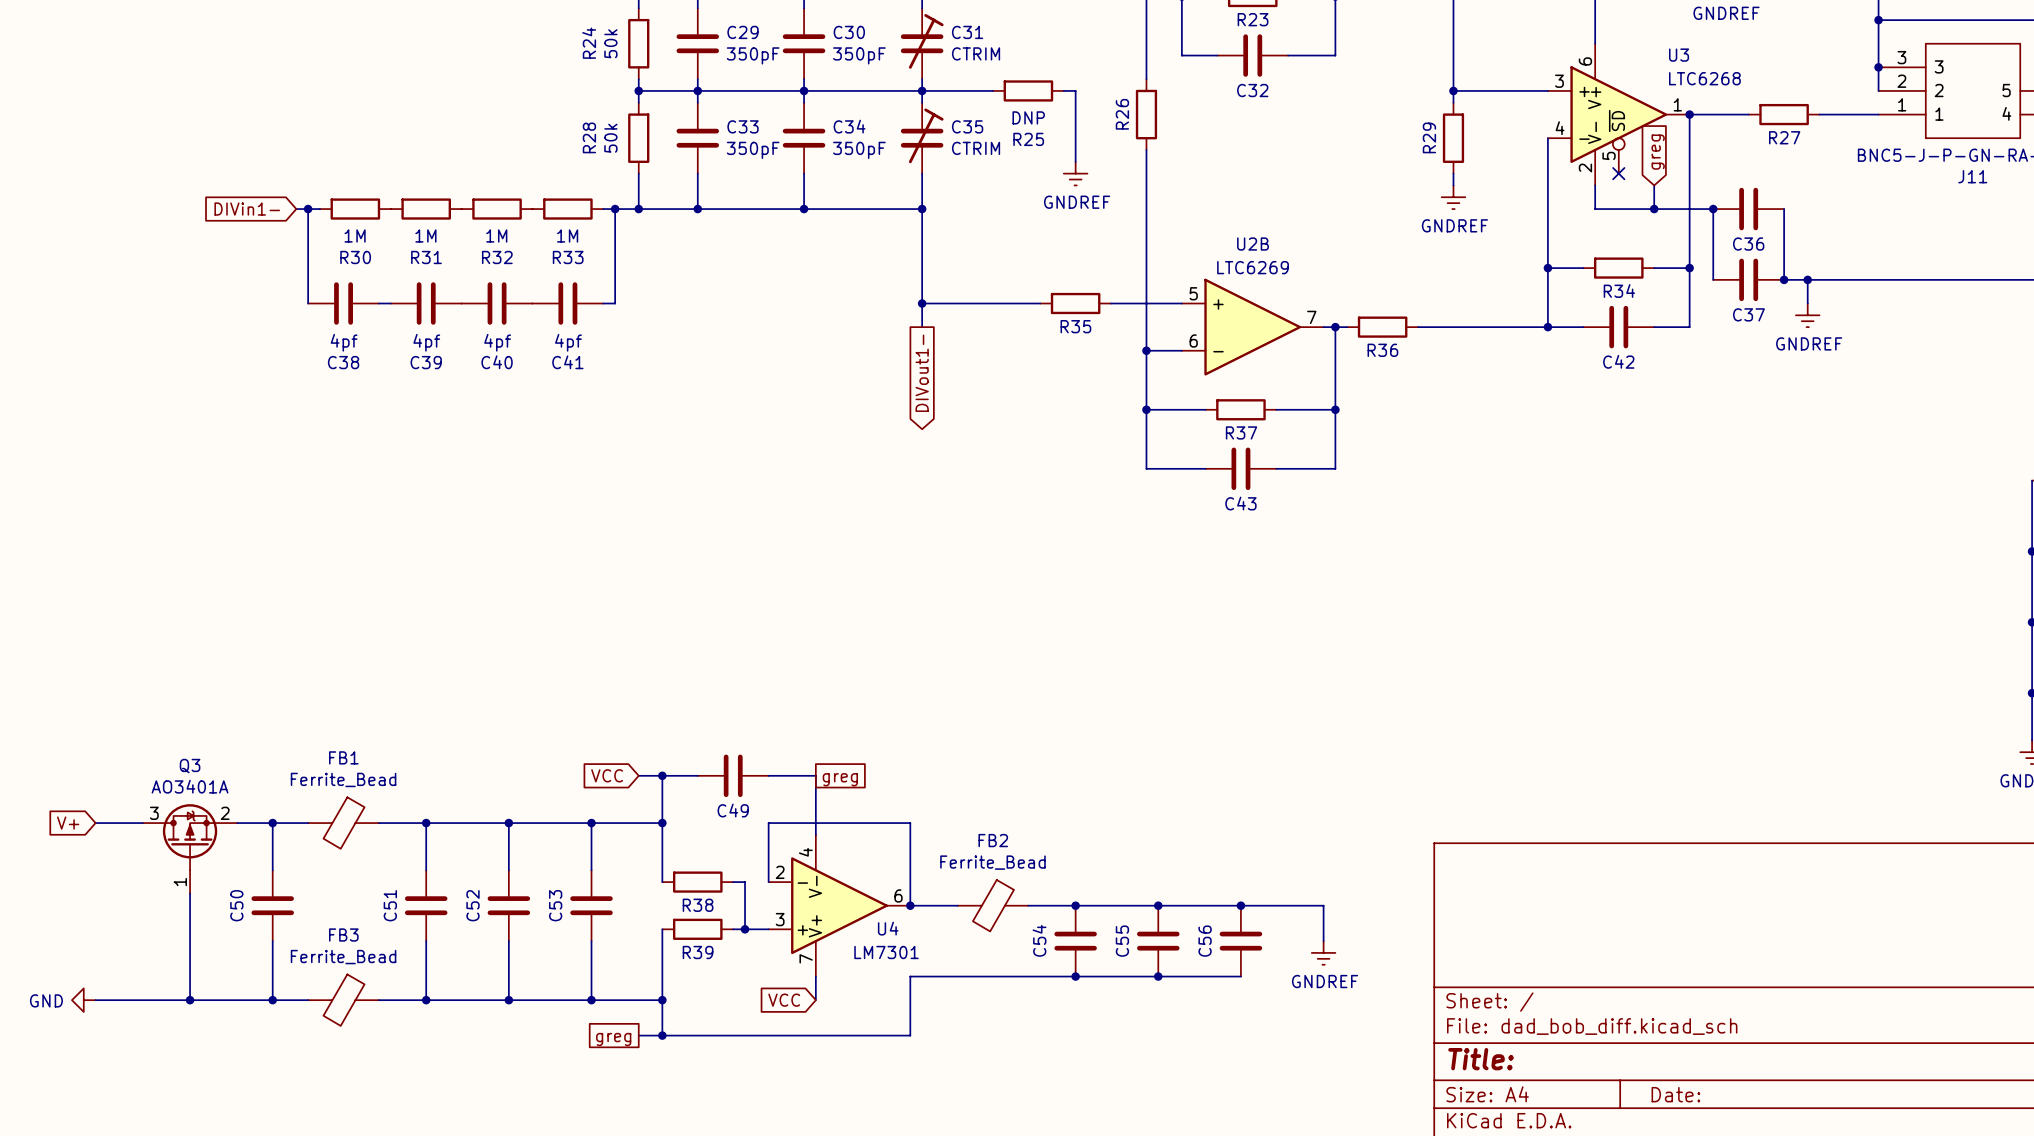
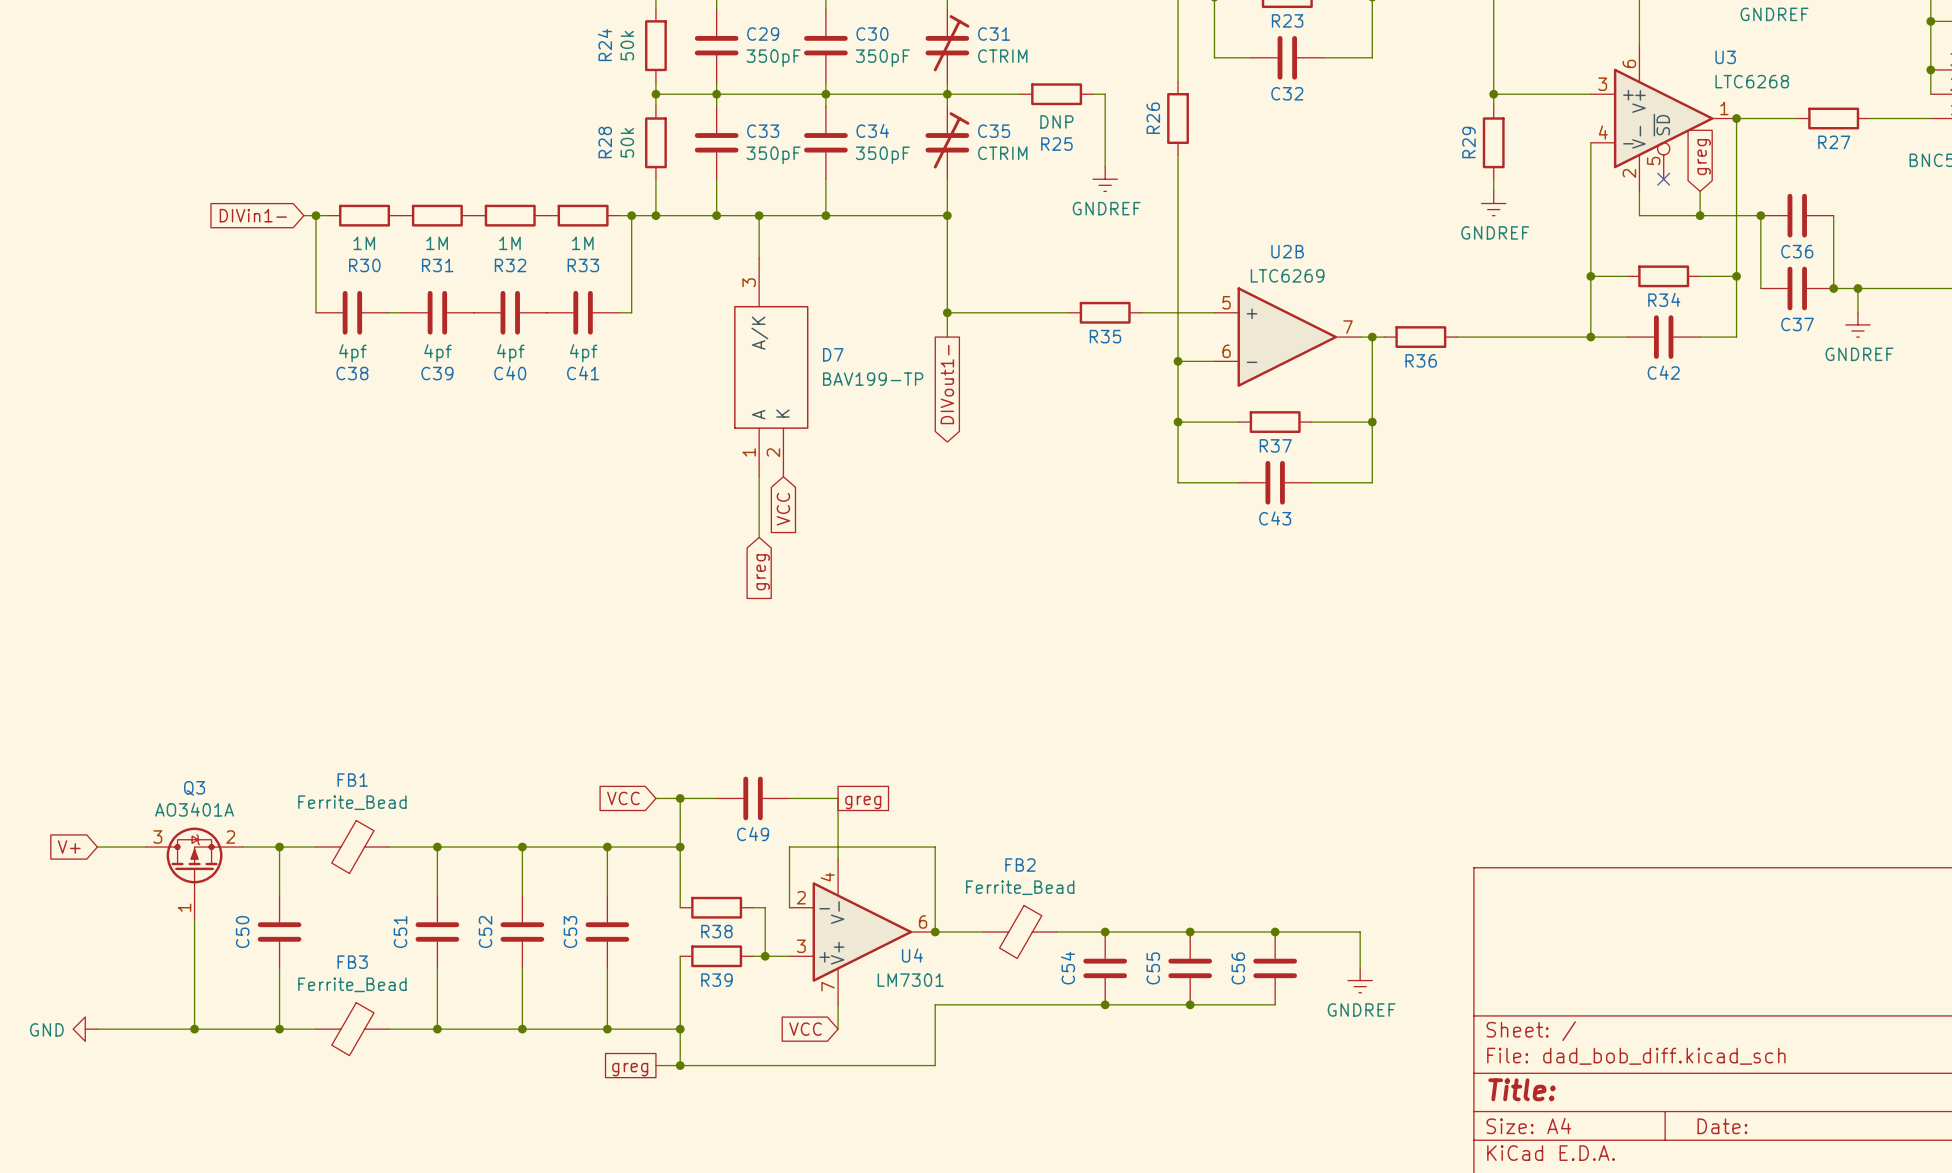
wire: none -> (759, 215) (759, 258)
junction: none -> (759, 215)
D7: none -> BAV199-TP (771, 367)
wire: none -> (759, 476) (759, 537)
global label: none -> VCC (783, 509)
global label: none -> greg (763, 572)

